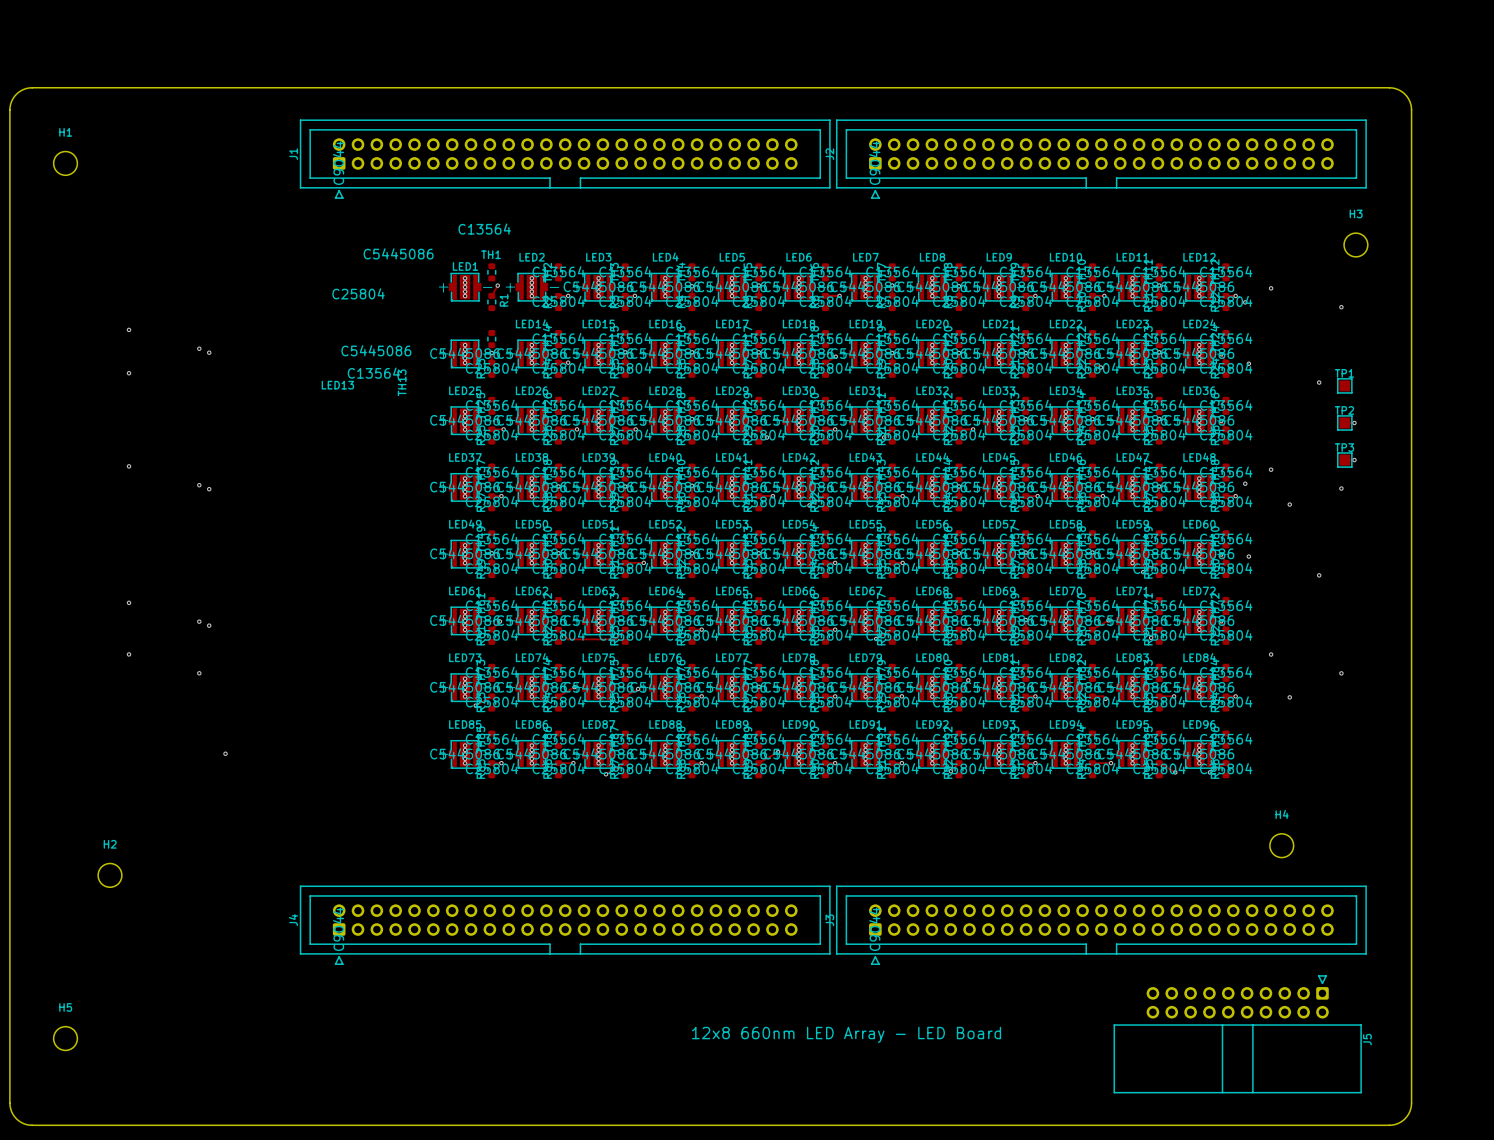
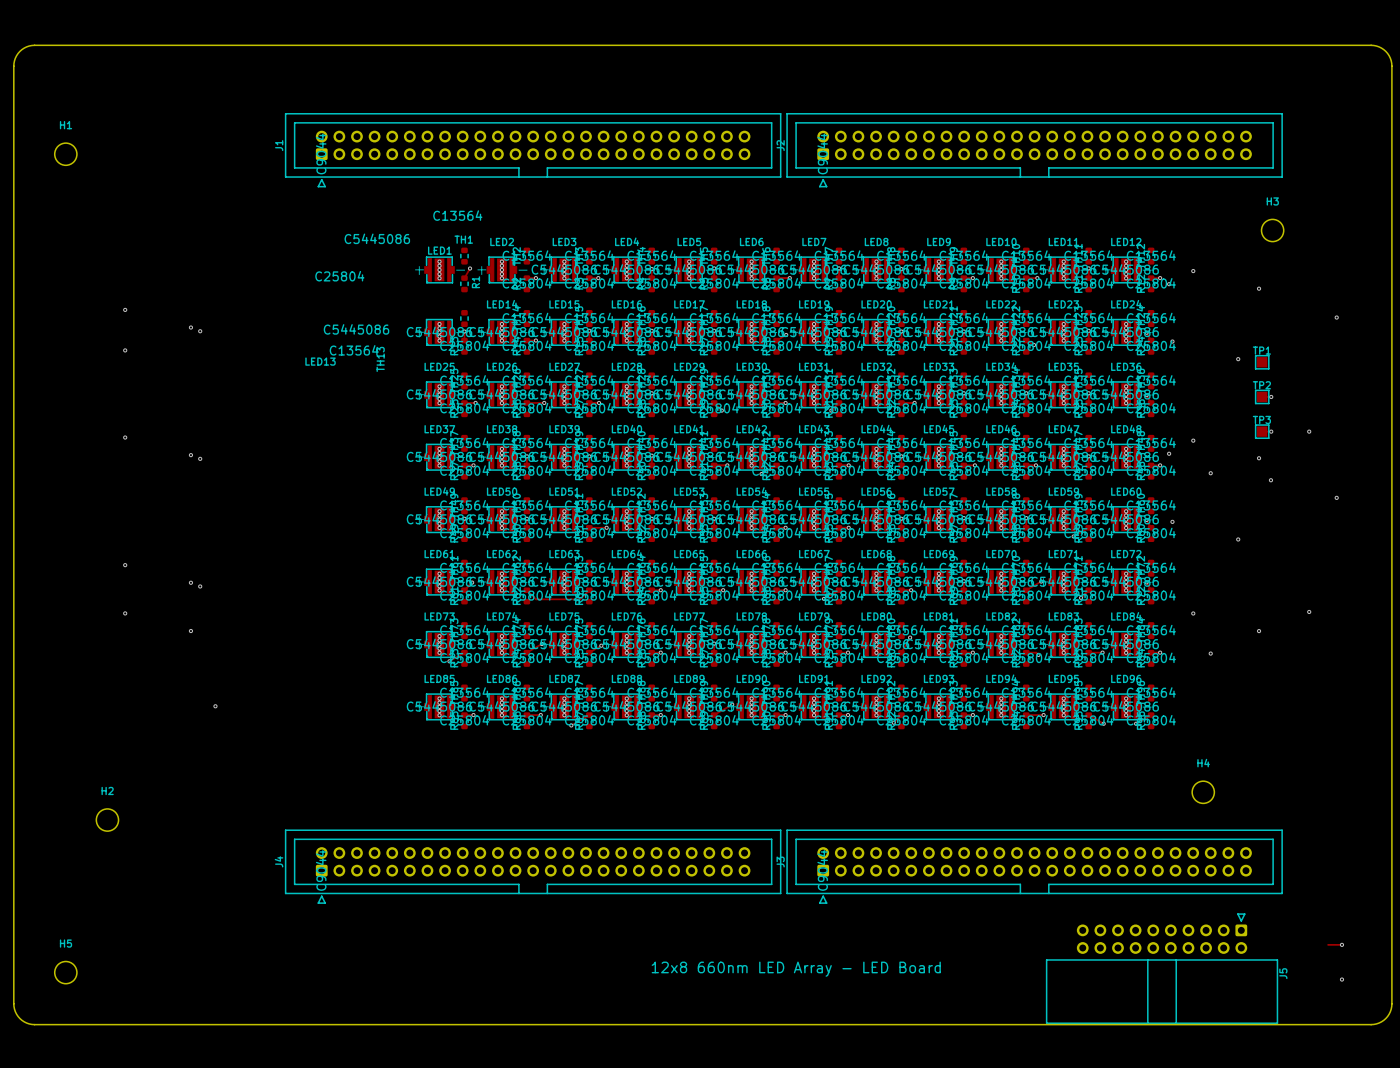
board edge: (9, 110) (11, 101) (16, 94) (23, 89) (32, 87) (1389, 87) (1402, 92) (1408, 98) (1411, 110) (1411, 1103) (1409, 1111) (1405, 1118) (1397, 1123) (1389, 1125) (32, 1125) (18, 1120) (11, 1111) (9, 1071) -> (13, 104) (15, 58) (24, 48) (34, 45) (1371, 45) (1379, 46) (1385, 51) (1390, 58) (1391, 66) (1391, 1003) (1390, 1011) (1383, 1020) (1371, 1024) (34, 1024) (26, 1023) (19, 1018) (15, 1011) (13, 1003)
via: none -> (1336, 317)
via: none -> (1309, 431)
via: none -> (1270, 480)
via: none -> (1336, 497)
via: none -> (1309, 611)
track: none -> (1328, 944) (1341, 944)
via: none -> (1341, 944)
via: none -> (1341, 979)

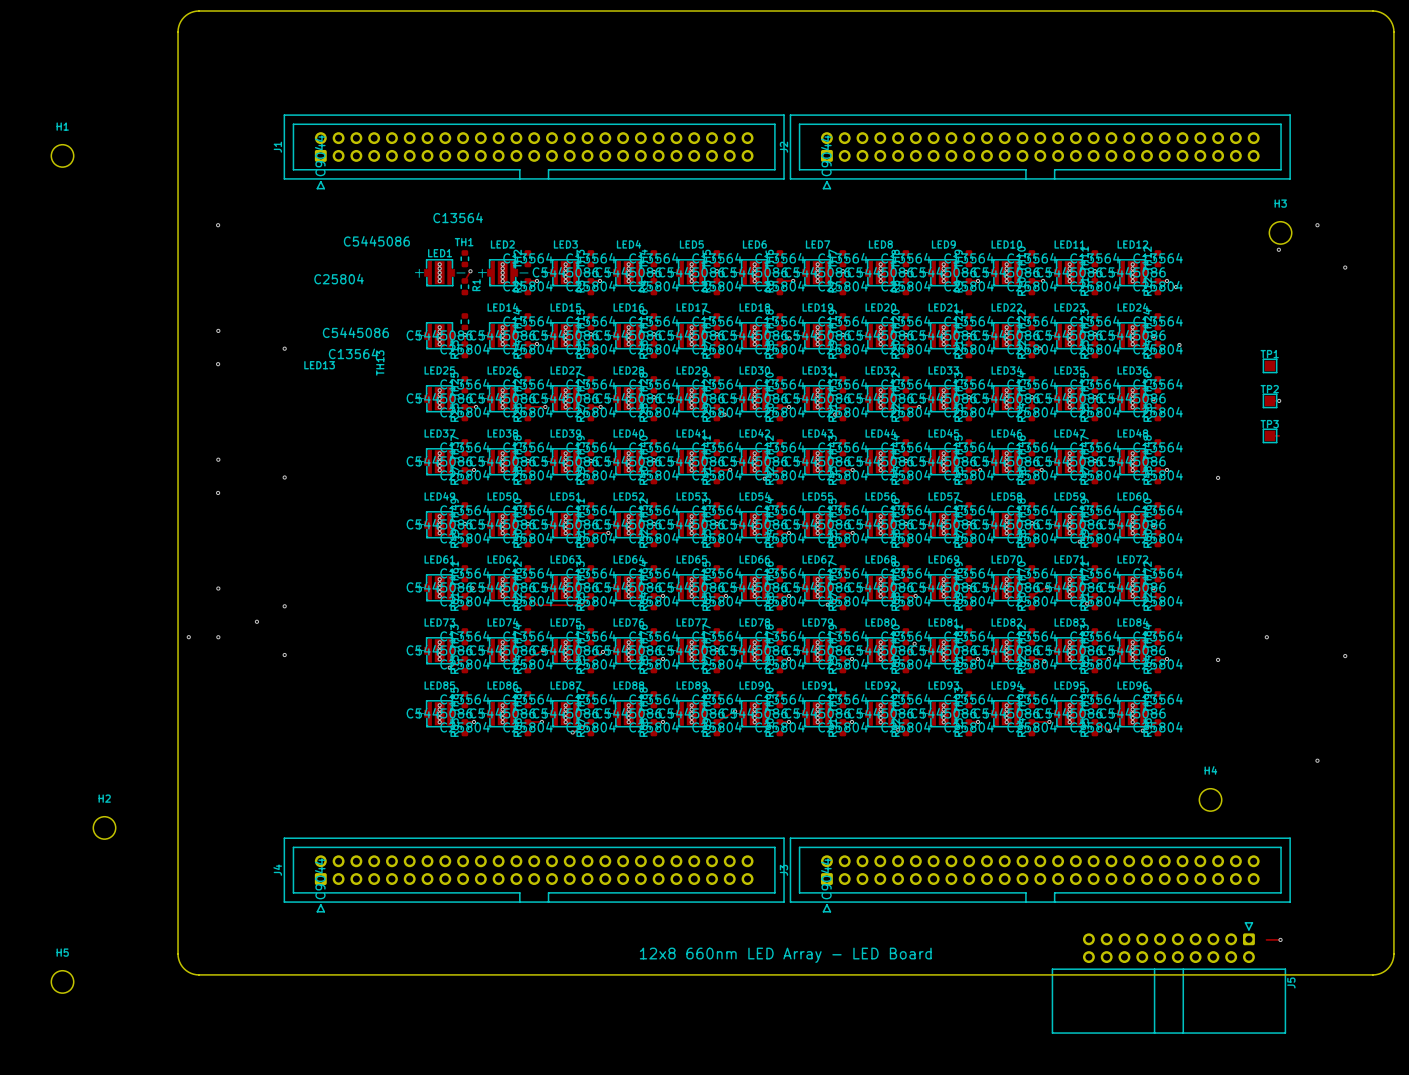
board edge: (34, 45) (1371, 45) (1383, 49) (1390, 58) (1391, 66) (1391, 1003) (1387, 1016) (1381, 1021) (1371, 1024) (34, 1024) (21, 1020) (15, 1011) (13, 1003) (13, 66) (15, 58) (19, 51) (26, 46) (34, 45) -> (199, 11) (190, 12) (184, 17) (179, 23) (178, 32) (178, 953) (179, 961) (186, 970) (199, 974) (1372, 974) (1383, 972) (1389, 966) (1393, 953) (1393, 32) (1391, 21) (1385, 15) (1372, 11) (199, 11)
via: none -> (218, 225)
via: none -> (1317, 225)
via: none -> (1278, 249)
via: none -> (1345, 267)
via: (1193, 271) -> none
via: (1259, 288) -> none
via: (125, 309) -> none
via: (1336, 317) -> none
via: (190, 327) -> none
via: none -> (218, 330)
via: (200, 331) -> none
via: none -> (284, 348)
via: (125, 350) -> none
via: (1238, 359) -> none
via: none -> (218, 364)
via: (1271, 431) -> none
via: (1309, 431) -> none
via: (125, 437) -> none
via: (1193, 440) -> none
via: (1169, 453) -> none
via: (190, 455) -> none
via: none -> (218, 459)
via: (200, 458) -> none
via: (1259, 458) -> none
via: none -> (284, 477)
via: (1270, 480) -> none
via: none -> (218, 492)
via: (1336, 497) -> none
via: (1172, 521) -> none
via: (1238, 539) -> none
via: (125, 565) -> none
via: (190, 582) -> none
via: none -> (218, 588)
via: (200, 586) -> none
via: none -> (284, 606)
via: (1309, 611) -> none
via: (125, 613) -> none
via: (1193, 613) -> none
via: none -> (256, 621)
via: none -> (218, 637)
via: none -> (284, 655)
via: none -> (1345, 656)
via: (215, 706) -> none
via: none -> (1317, 760)
via: none -> (1280, 939)
track: (1328, 944) (1341, 944) -> (1266, 939) (1280, 939)
via: (1341, 944) -> none
text position: 12x8 660nm LED Array - LED Board (796, 969) -> 12x8 660nm LED Array - LED Board (785, 955)
via: (1341, 979) -> none

